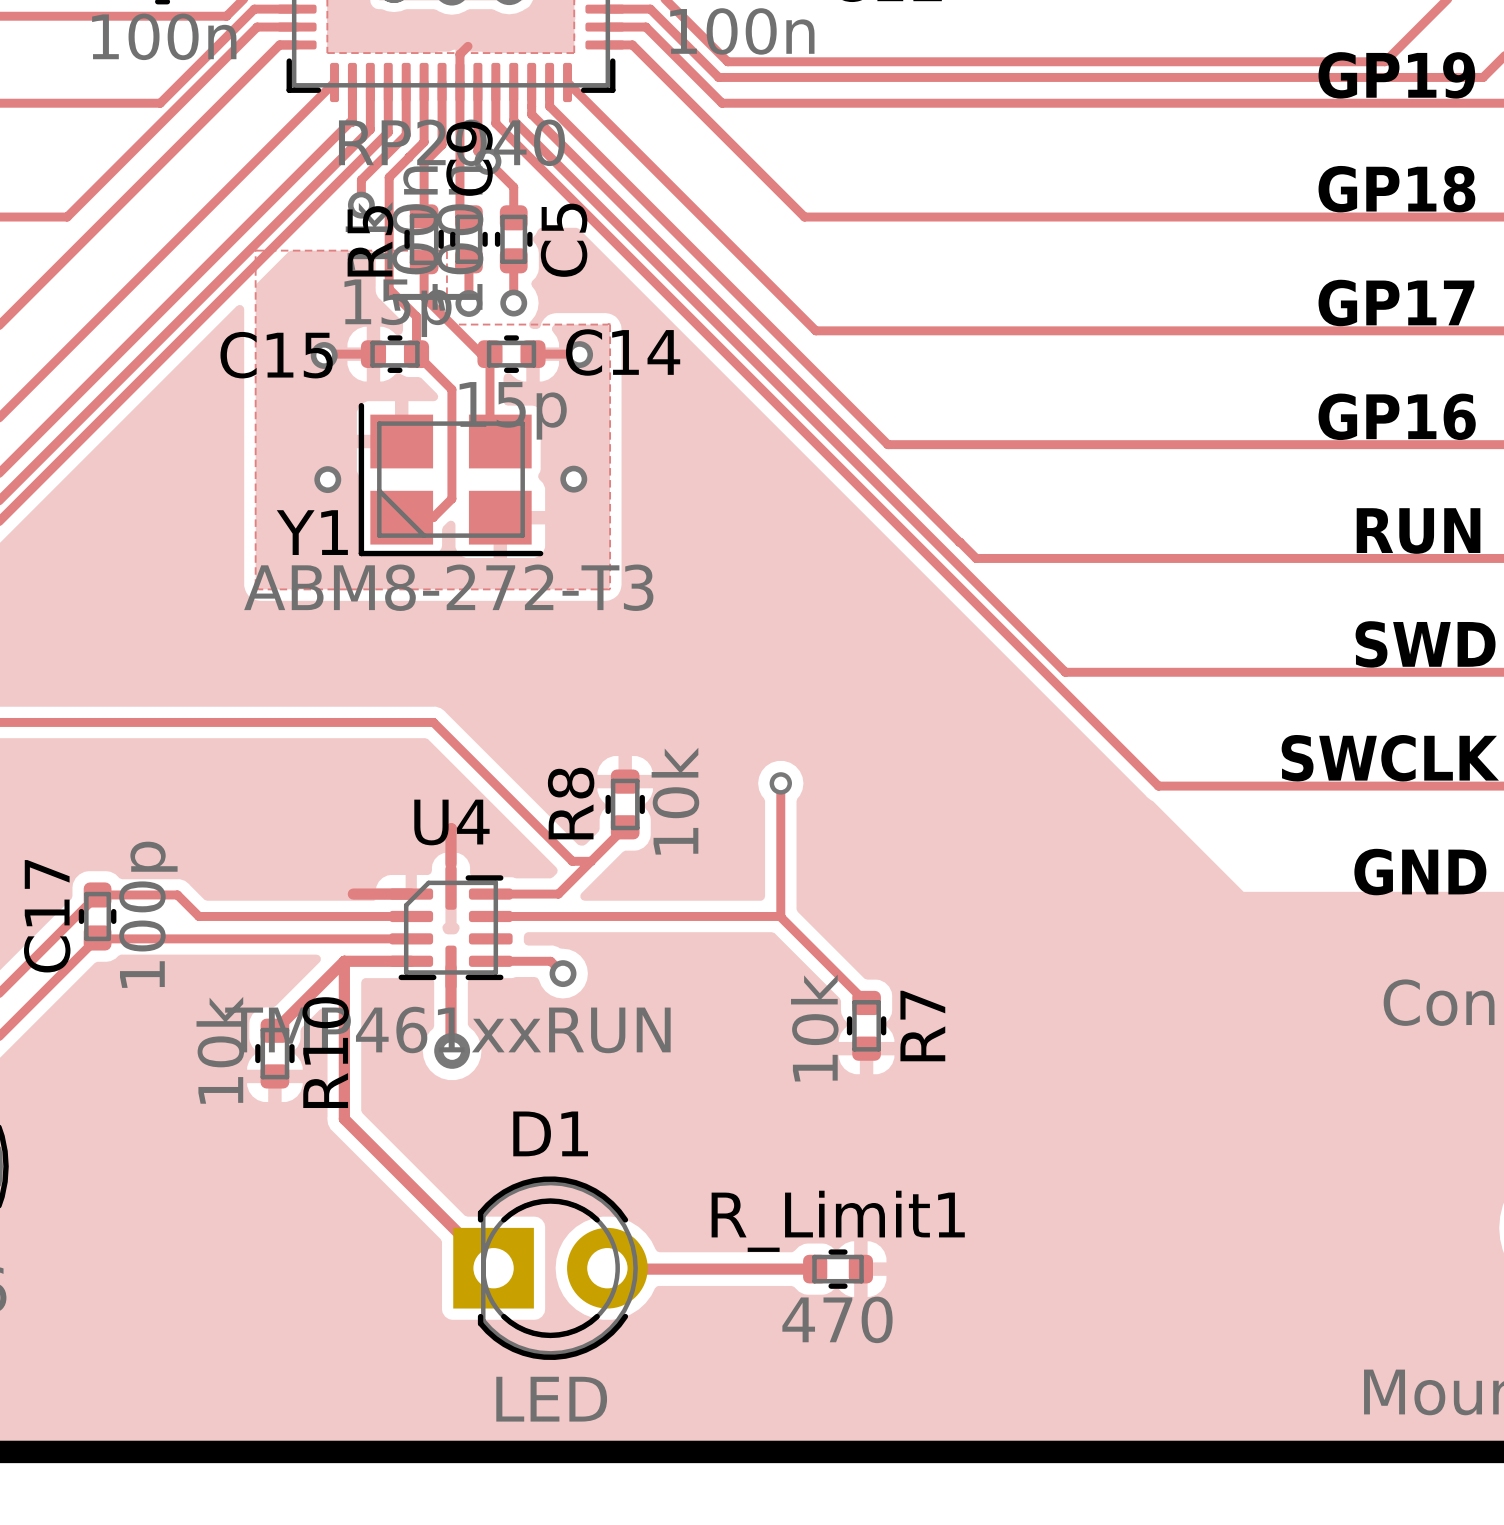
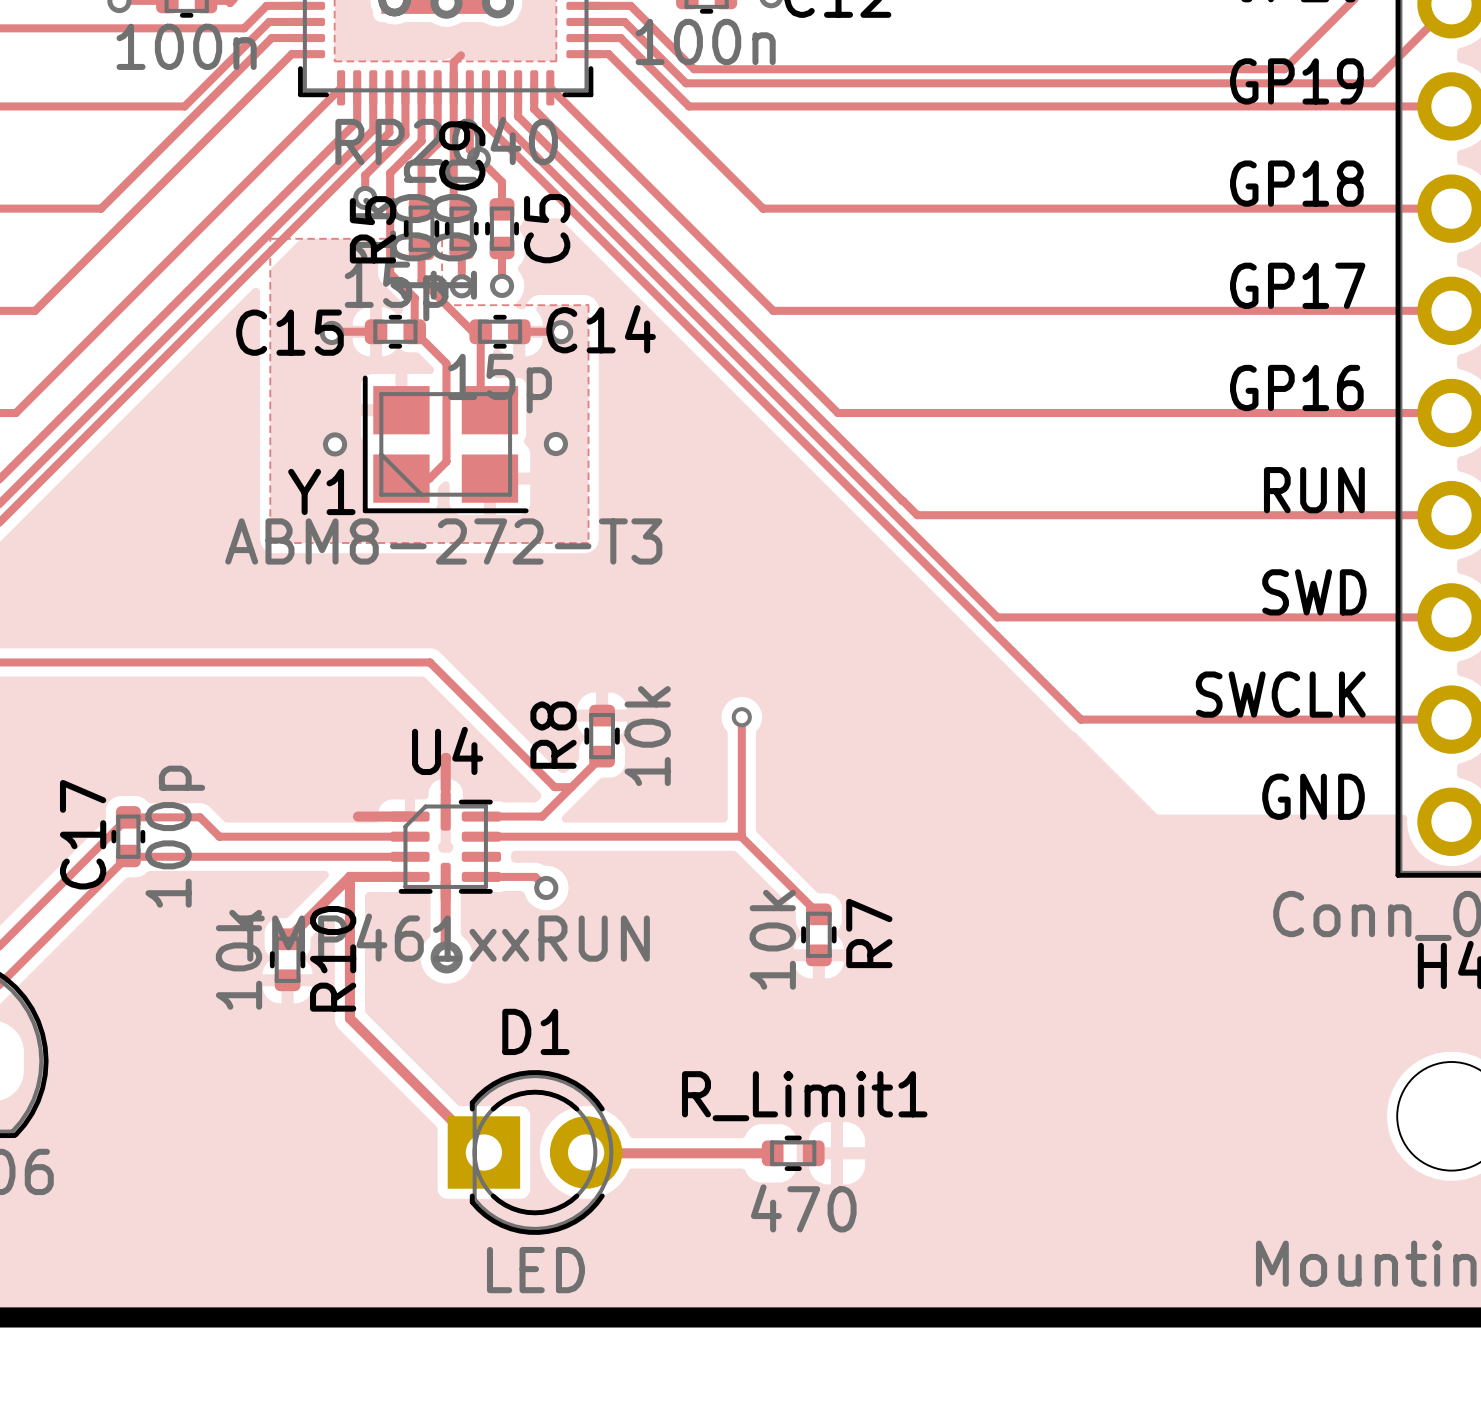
R_Limit1 name position: R_Limit1 (838, 1221) -> R_Limit1 (804, 1096)
R_Limit1 value position: 470 (837, 1319) -> 470 (803, 1208)

